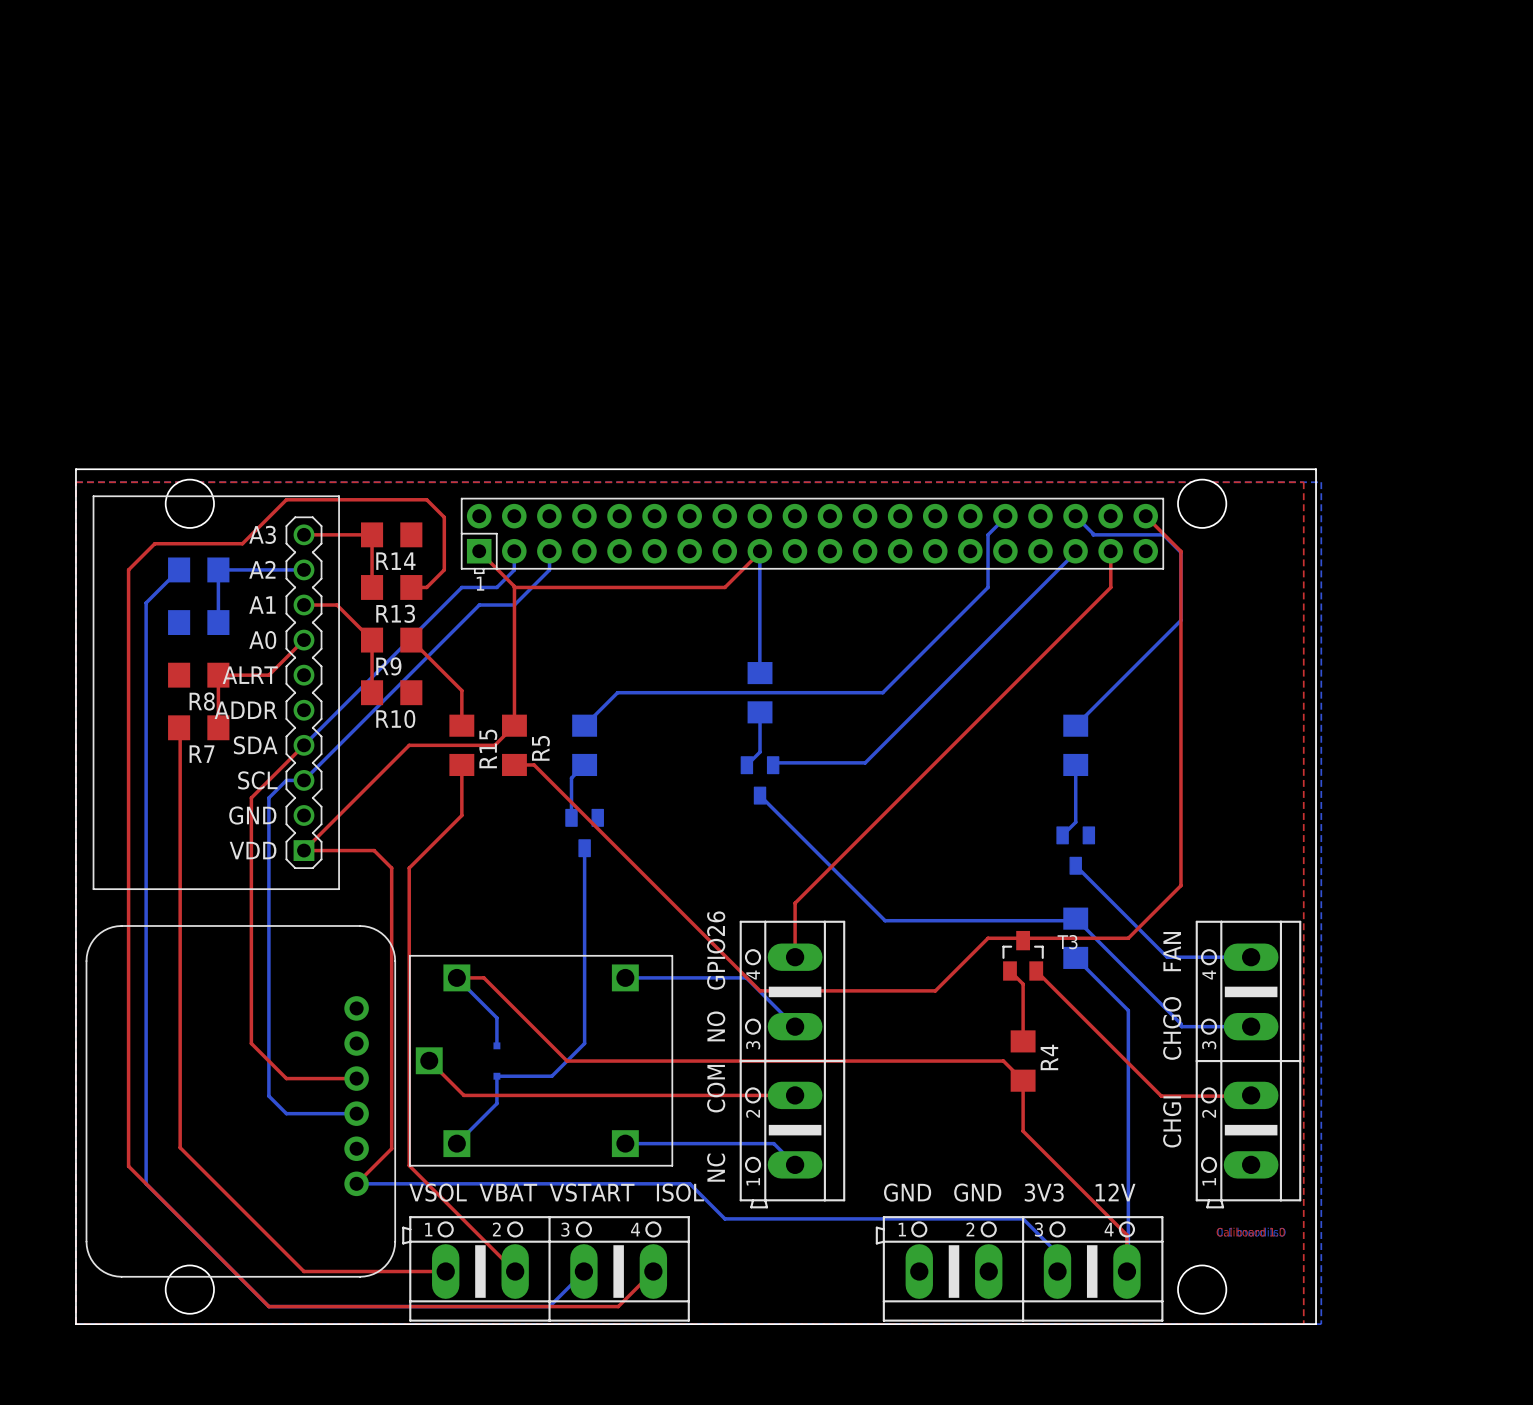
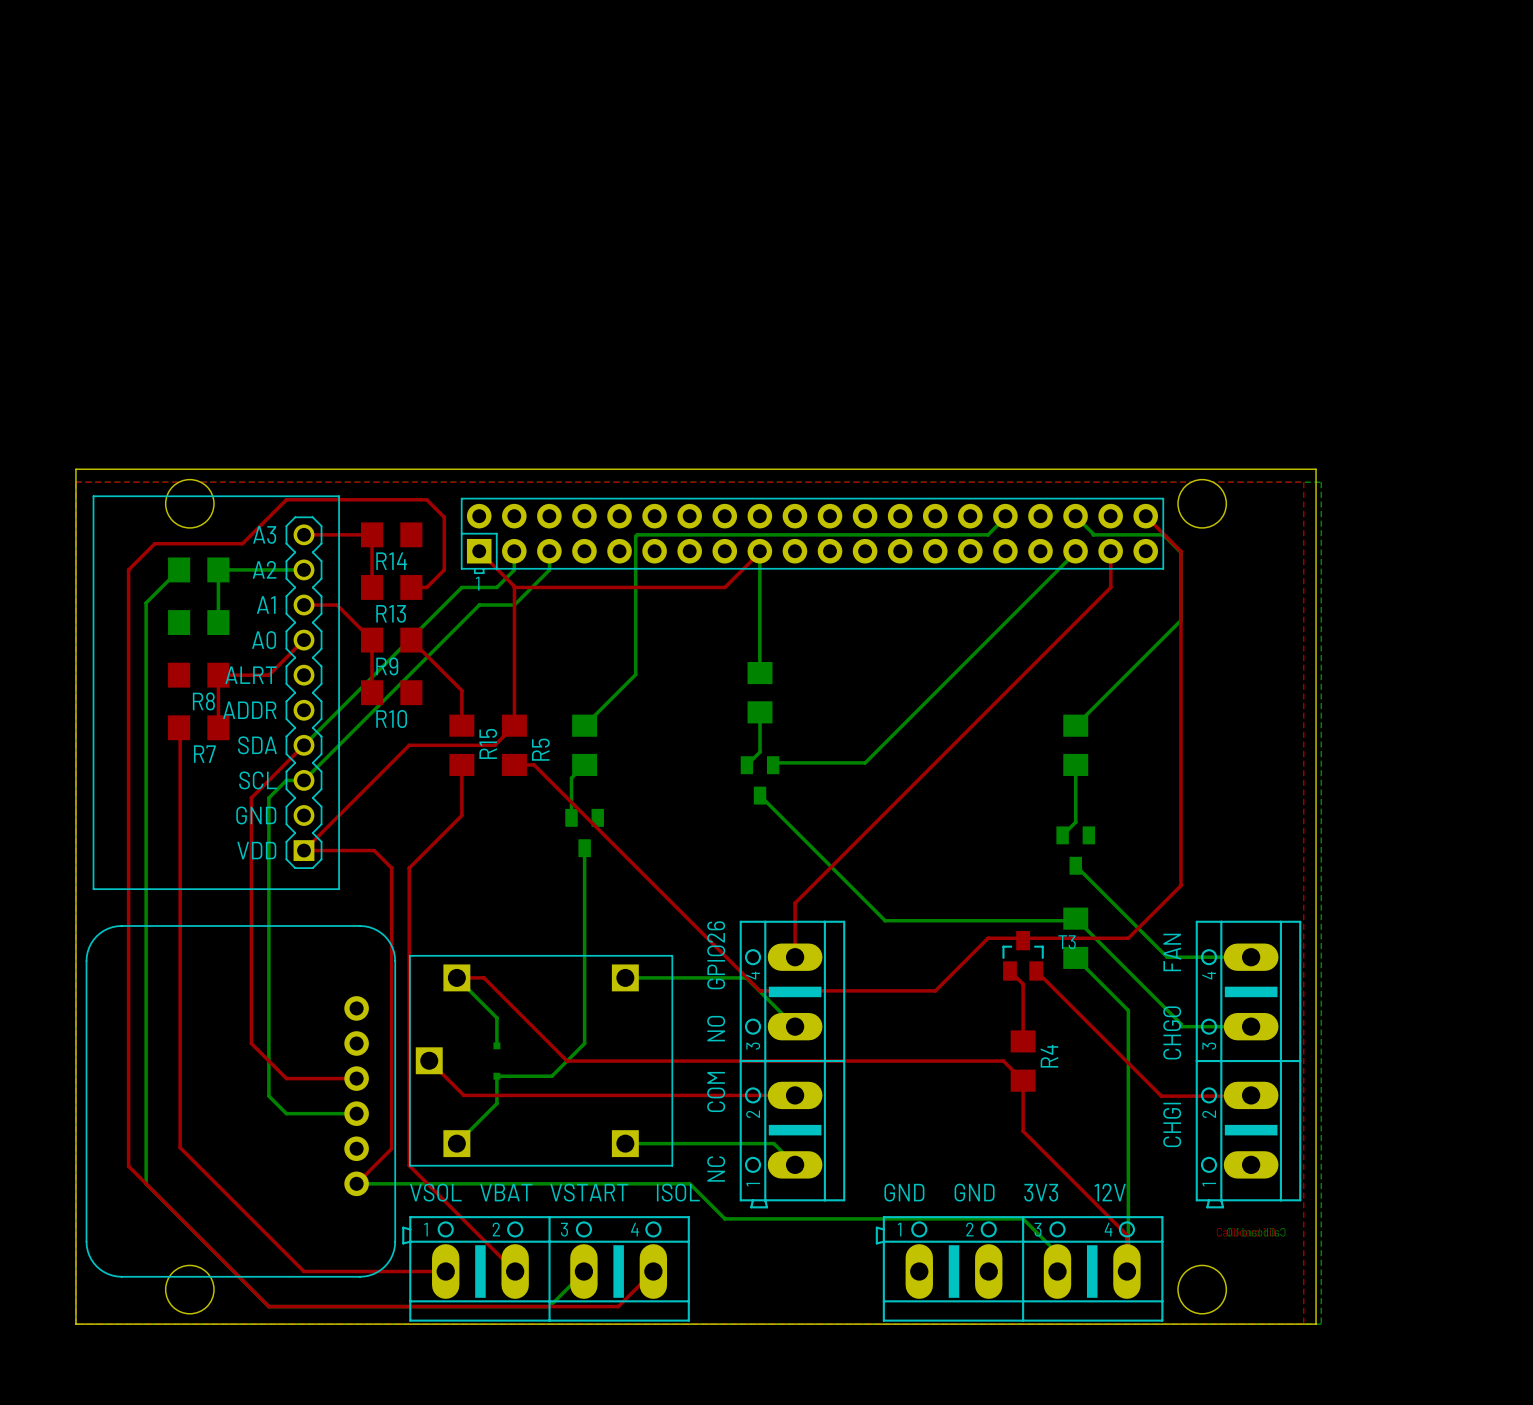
bottom track: (988, 534) (988, 587) (882, 692) (617, 692) -> (988, 534) (637, 534) (635, 536) (635, 674) (617, 692)

